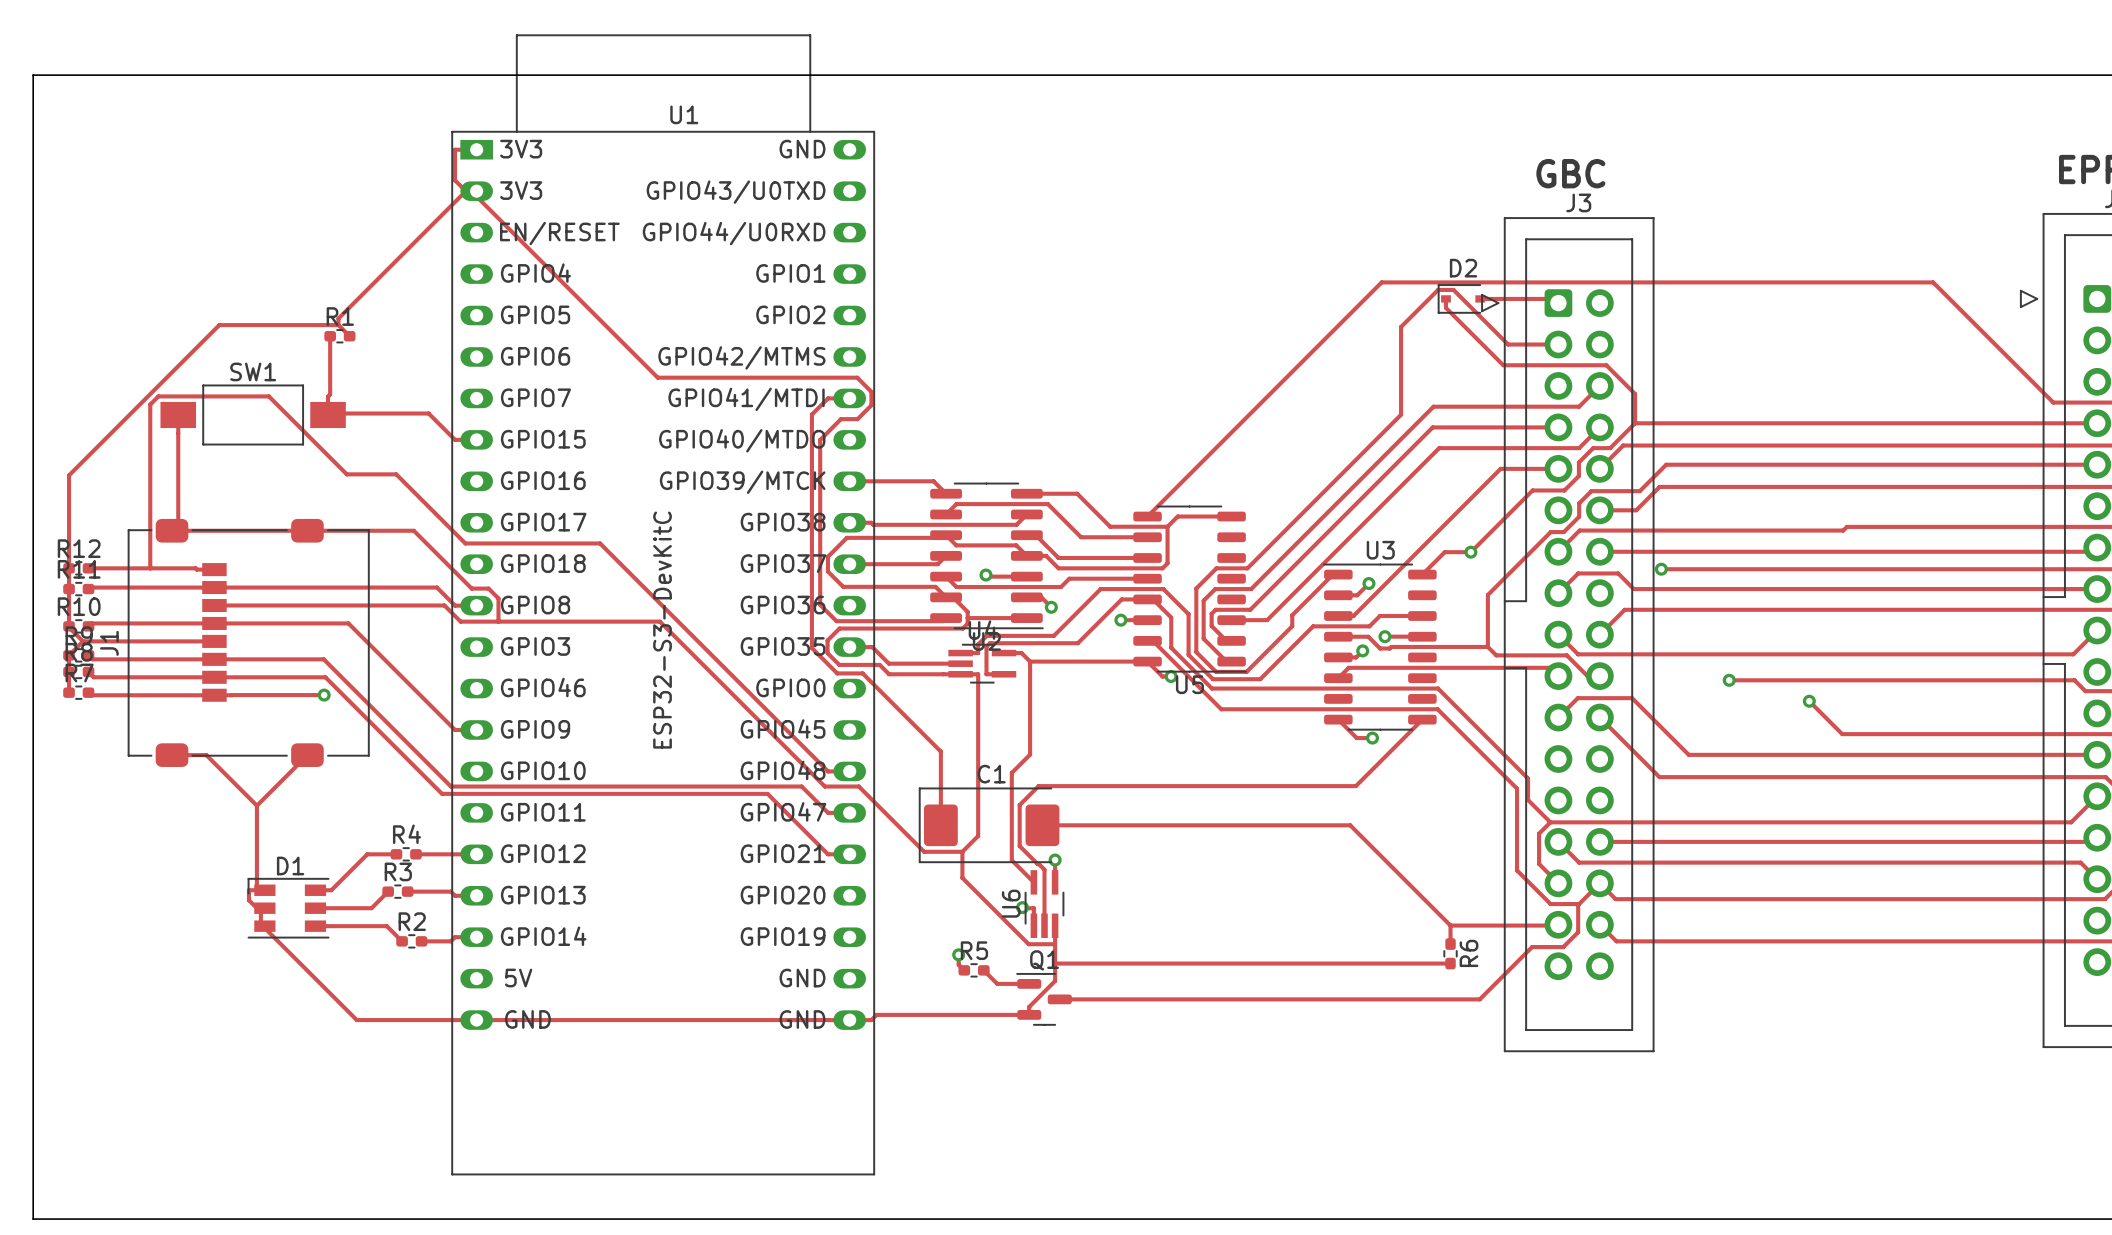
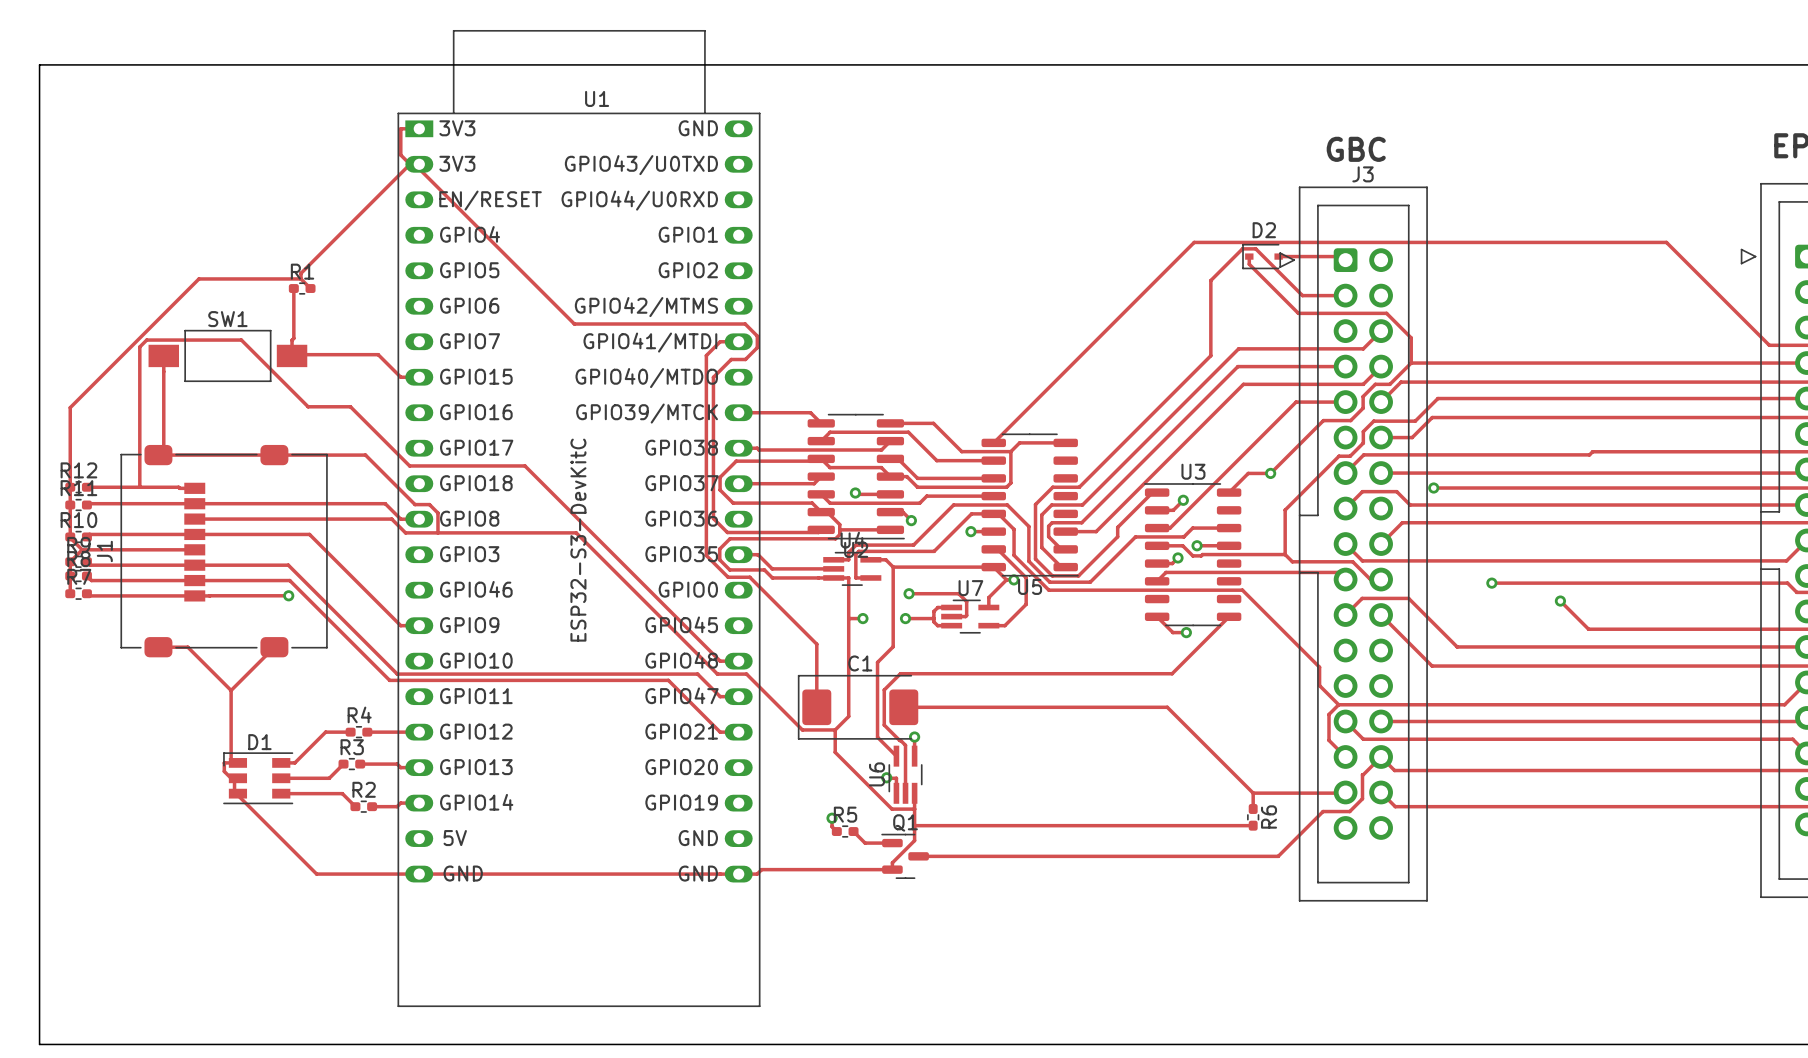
track: (1152, 640) (1221, 709) (1437, 709) (1517, 788) (1517, 870) (1550, 904) (1578, 904) -> none
track: none -> (997, 549) (1026, 577) (1026, 604) (1004, 625) (988, 625)
track: none -> (1006, 579) (988, 597) (988, 607)
track: none -> (909, 593) (958, 593) (966, 601) (966, 615) (951, 616)
via: none -> (909, 593)
track: none -> (951, 607) (937, 607) (933, 611) (933, 621) (937, 625) (951, 625)
U7: none -> (970, 616)
track: none -> (848, 618) (862, 618)
via: none -> (862, 618)
track: none -> (905, 618) (933, 618)
via: none -> (905, 618)

